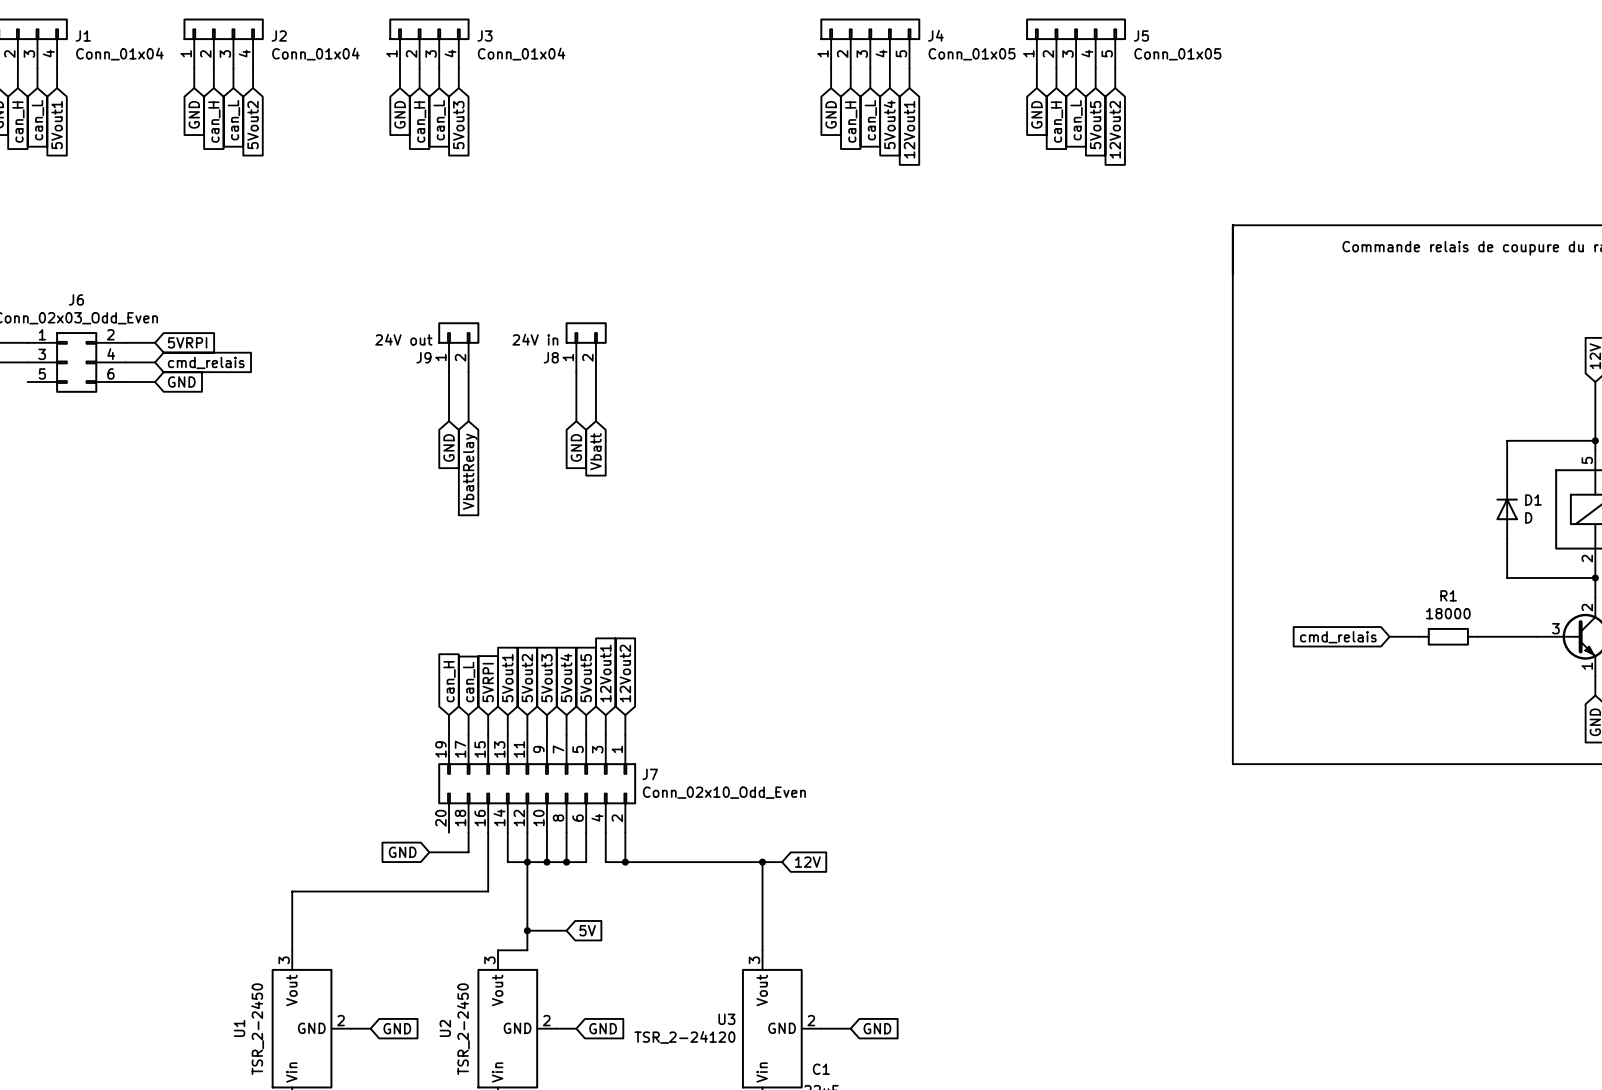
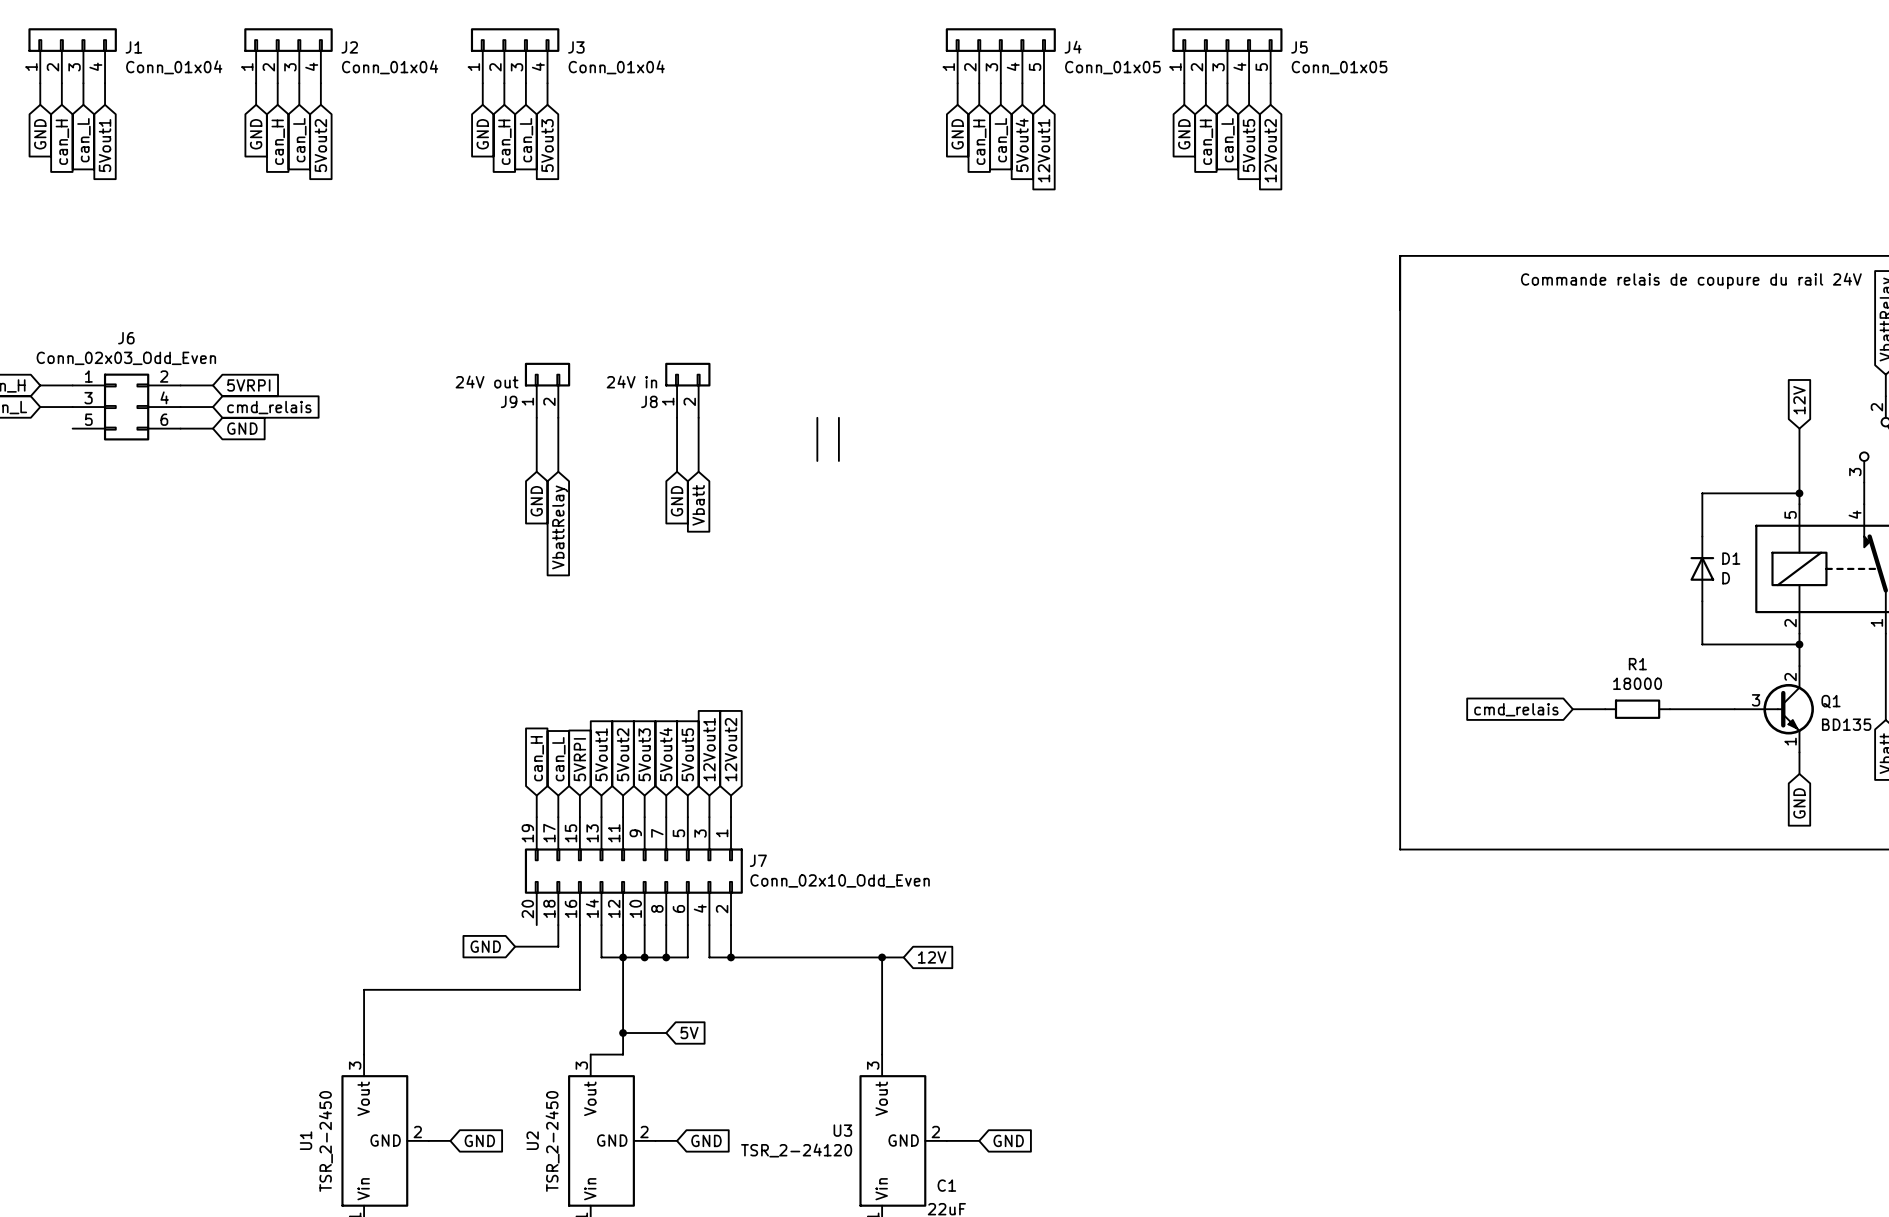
wire: none -> (817, 417) (817, 460)
wire: none -> (838, 417) (838, 460)

